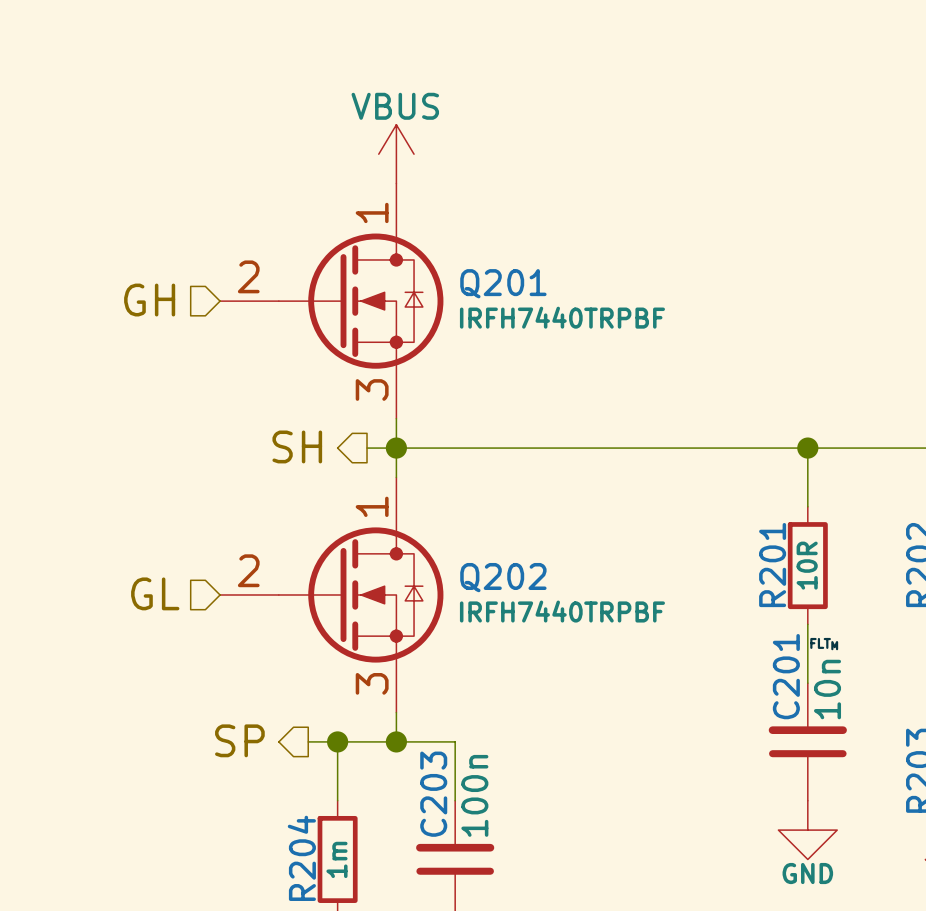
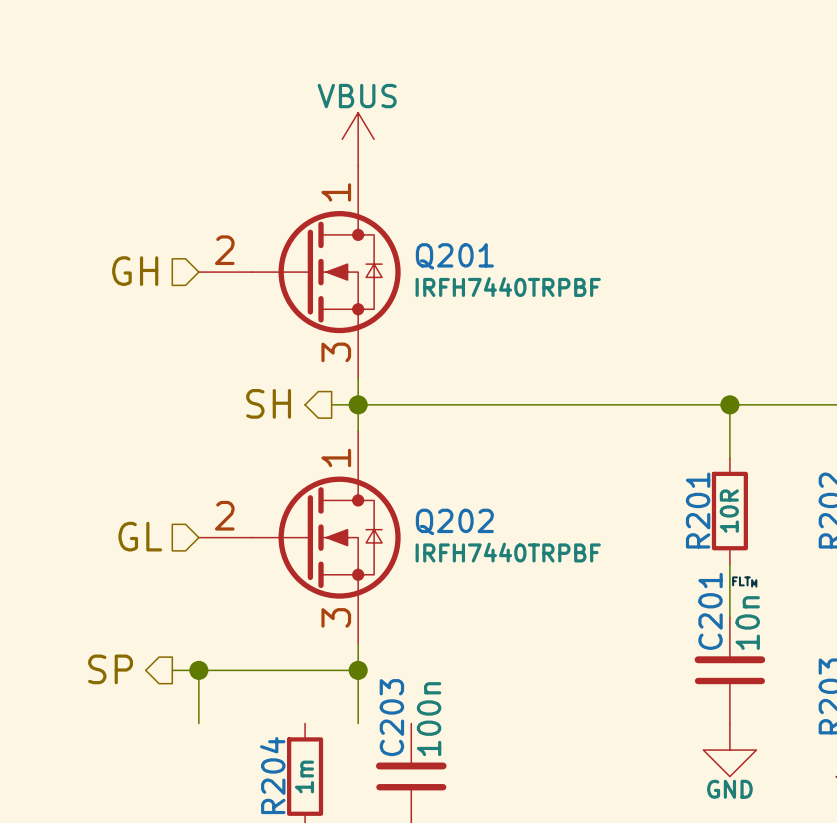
hierarchical label position: SP (239, 740) -> SP (110, 669)
wire: none -> (172, 670) (278, 670)
wire: (337, 741) (337, 800) -> (198, 670) (198, 723)
junction position: (337, 741) -> (198, 670)
wire: (396, 741) (455, 741) (455, 800) -> (358, 670) (358, 723)

